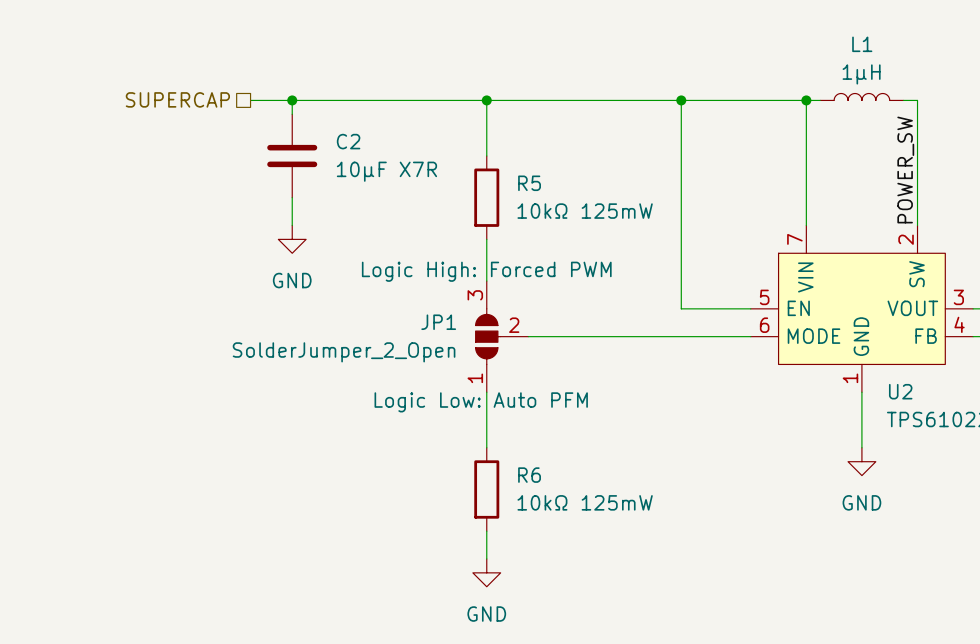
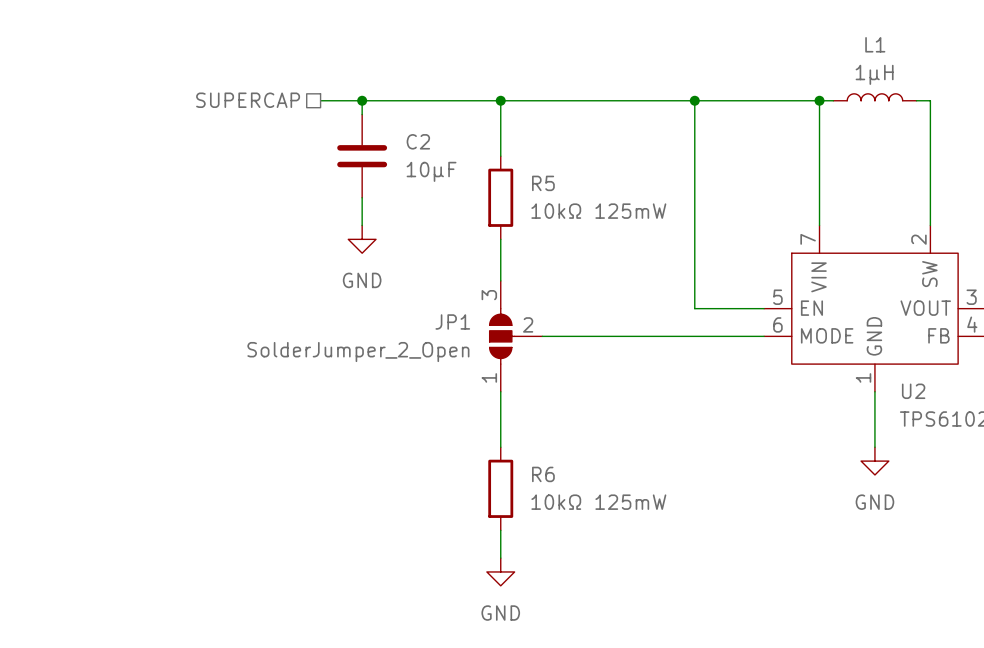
hierarchical label position: SUPERCAP (177, 99) -> SUPERCAP (248, 100)
wire: (250, 100) (306, 100) -> none
wire: (292, 100) (292, 114) -> (362, 100) (362, 114)
junction position: (292, 100) -> (362, 100)
C2 position: (292, 156) -> (362, 156)
label: POWER_SW (905, 170) -> none
C2 value: 10µF X7R (386, 171) -> 10µF (431, 171)
wire: (292, 197) (292, 225) -> (362, 197) (362, 225)
power symbol position: GND (292, 239) -> GND (362, 239)
JP1 text: Logic High: Forced PWM (486, 271) -> none
JP1 text: Logic Low: Auto PFM (481, 402) -> none

